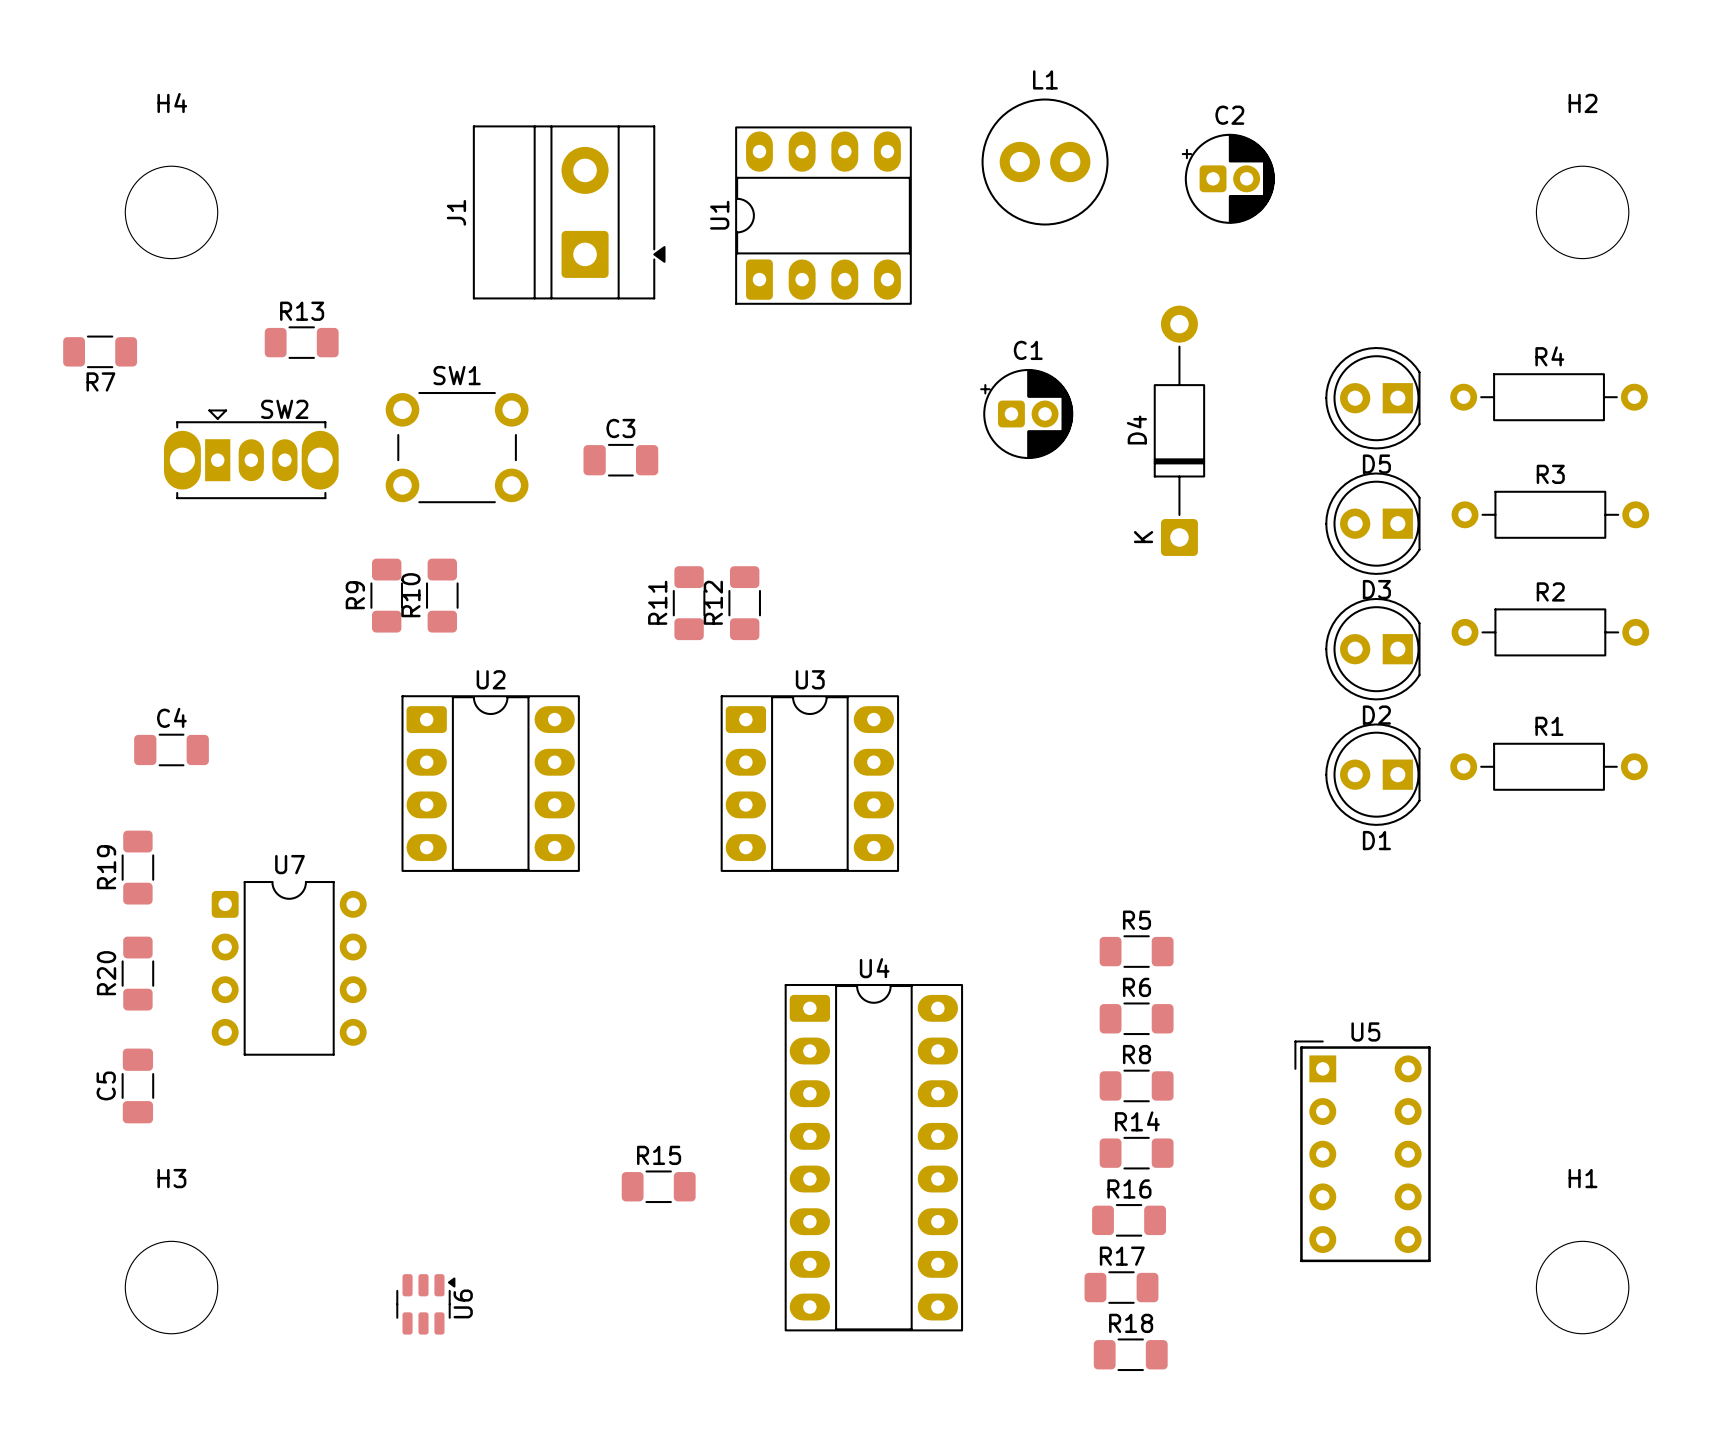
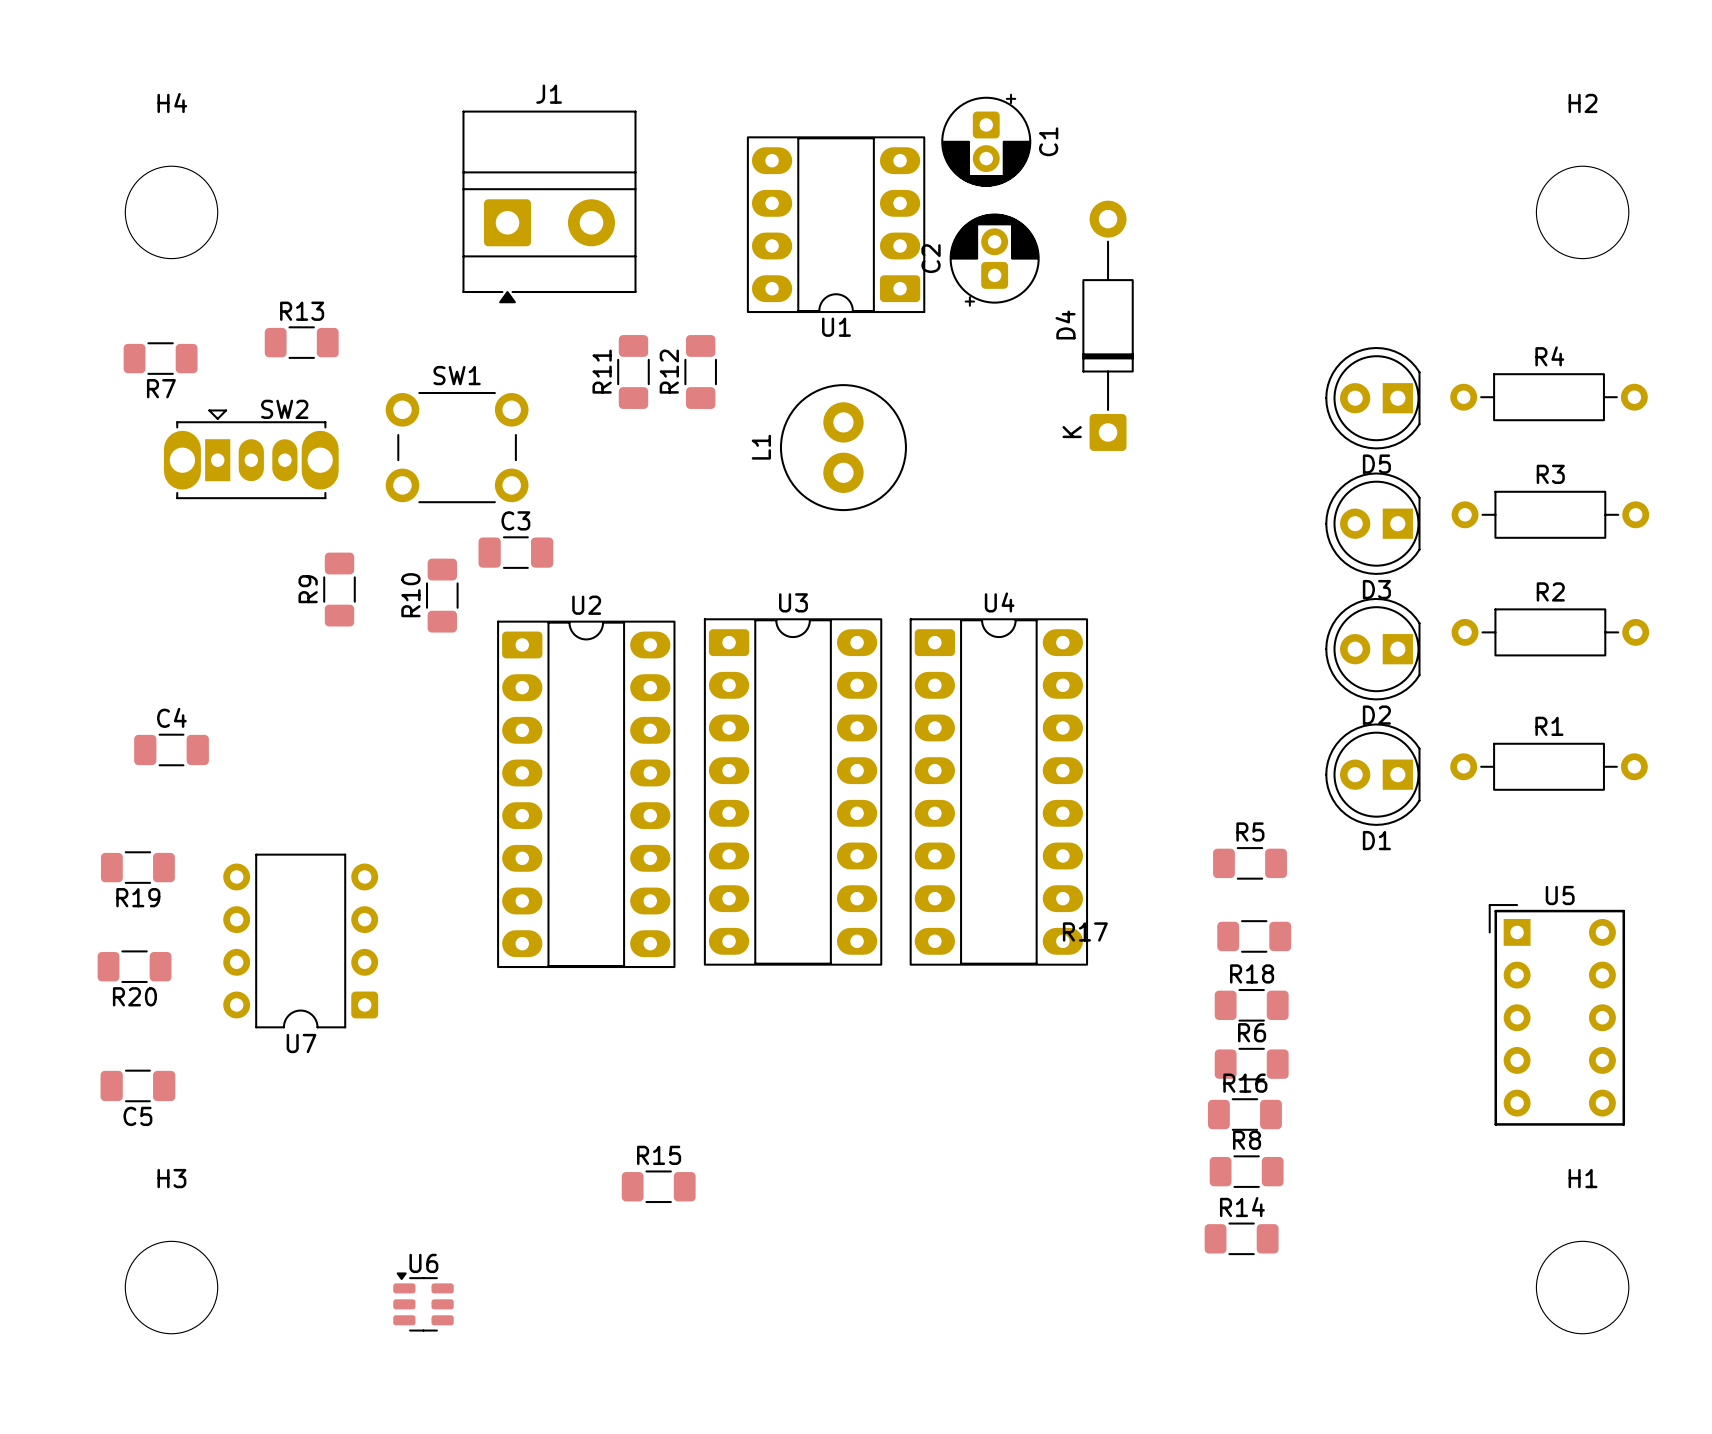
L1 name position: L1 (1045, 79) -> L1 (761, 447)
L1 rotation: 0° (1045, 162) -> 90° clockwise (843, 447)
L1 position: (1045, 162) -> (843, 447)
C2 rotation: 0° (1228, 178) -> 90° counterclockwise (994, 260)
C2 position: (1228, 178) -> (994, 260)
J1 rotation: 0° (569, 212) -> 90° clockwise (549, 206)
U1 rotation: 0° (823, 215) -> 90° counterclockwise (836, 224)
R7 position: (100, 351) -> (160, 358)
C1 rotation: 0° (1026, 414) -> 90° clockwise (986, 140)
C1 position: (1026, 414) -> (986, 140)
D4 position: (1179, 430) -> (1108, 325)
C3 position: (620, 460) -> (515, 552)
R9 position: (386, 595) -> (339, 589)
R11 position: (689, 603) -> (633, 372)
R12 position: (744, 603) -> (700, 372)
U2 name position: U2 (491, 679) -> U2 (586, 605)
U3 name position: U3 (810, 679) -> U3 (793, 602)
U2 footprint: [401, 695, 580, 872] -> [497, 620, 676, 969]
U3 footprint: [720, 695, 900, 872] -> [703, 618, 883, 966]
R19 name position: R19 (106, 867) -> R19 (138, 897)
R19 rotation: 0° (137, 867) -> 90° clockwise (137, 867)
R5 position: (1136, 951) -> (1250, 863)
U7 rotation: 0° (289, 968) -> 180° (300, 940)
R20 name position: R20 (106, 973) -> R20 (134, 996)
R20 rotation: 0° (137, 973) -> 90° clockwise (134, 966)
R6 position: (1136, 1018) -> (1251, 1064)
C5 name position: C5 (106, 1085) -> C5 (137, 1116)
C5 rotation: 0° (137, 1085) -> 90° clockwise (137, 1085)
R8 position: (1136, 1085) -> (1246, 1171)
U5 position: (1362, 1151) -> (1556, 1014)
R14 position: (1136, 1153) -> (1241, 1238)
U4 position: (873, 1157) -> (998, 791)
R16 position: (1129, 1220) -> (1244, 1114)
R17 name position: R17 (1122, 1256) -> R17 (1085, 931)
R17 position: (1121, 1287) -> (1254, 936)
U6 rotation: 0° (425, 1304) -> 90° counterclockwise (423, 1301)
R18 position: (1130, 1354) -> (1251, 1005)

